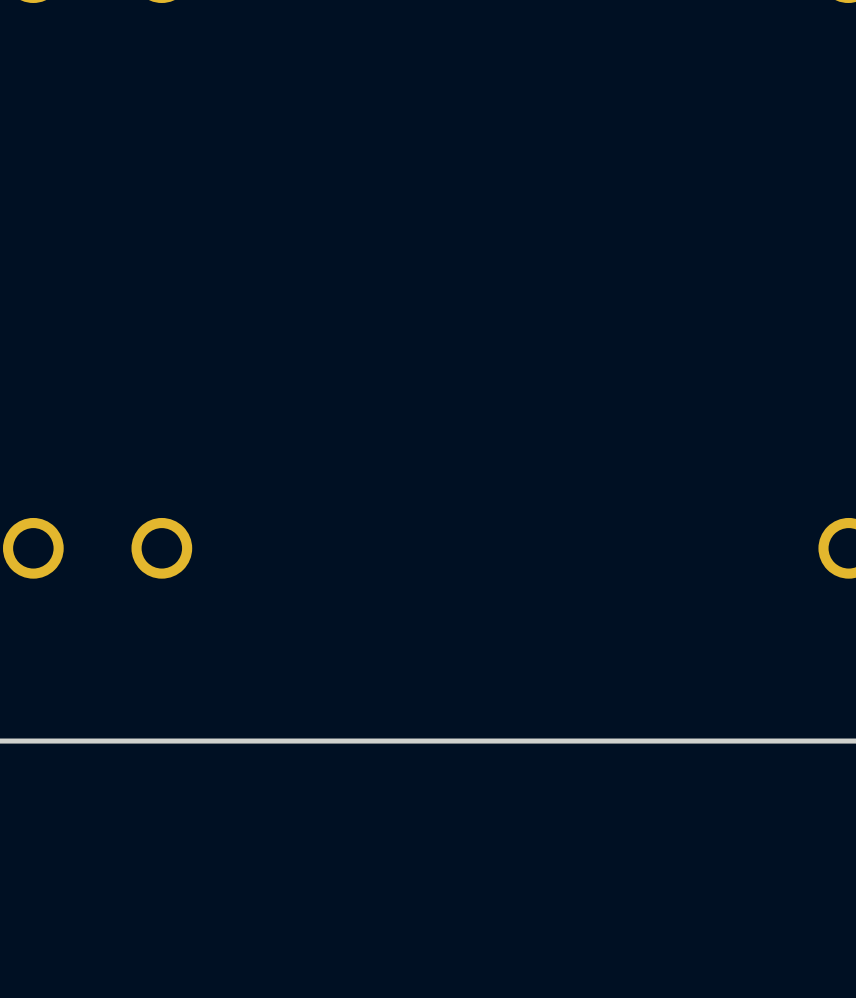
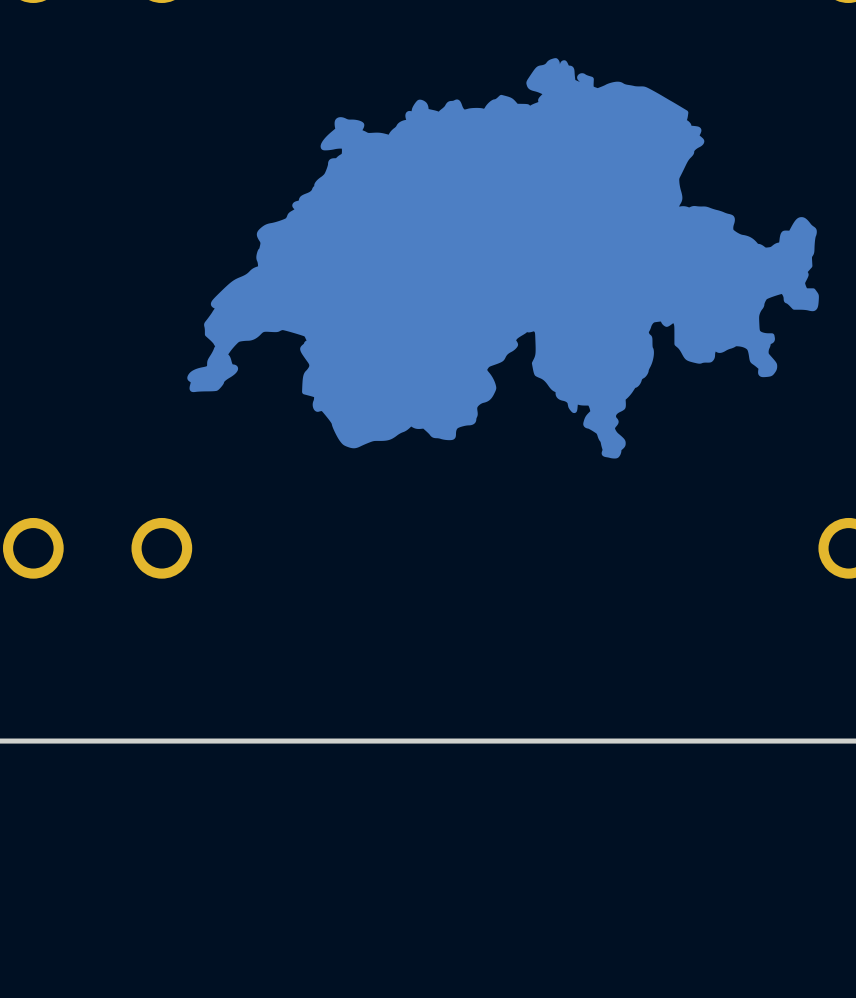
drawing: none -> [187, 58, 819, 459]

